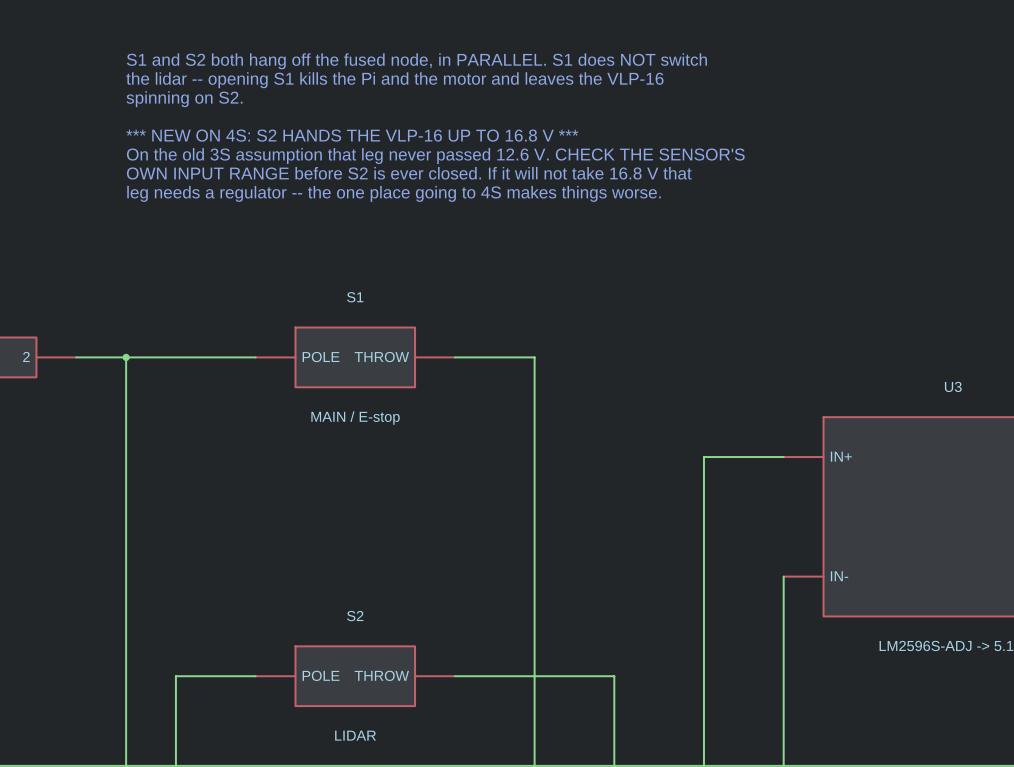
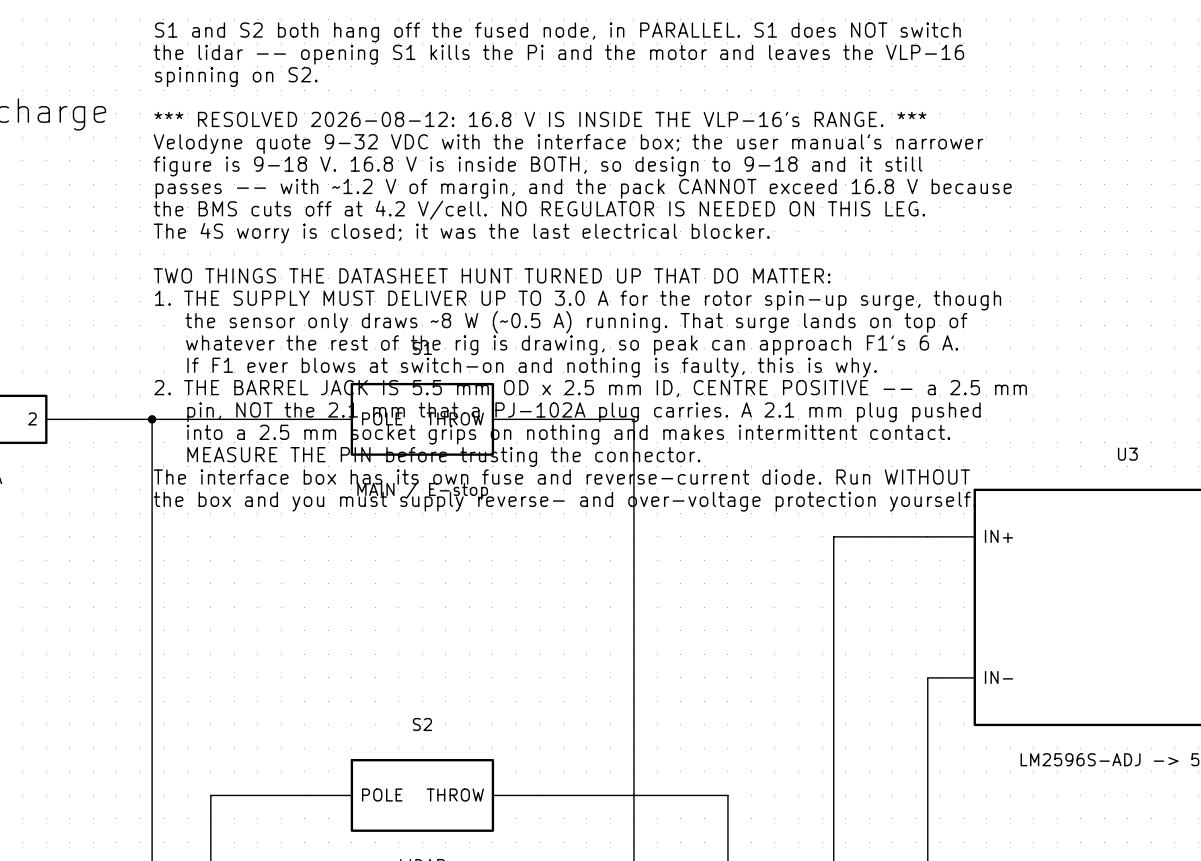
text position: S1 and S2 both hang off the fused node, in PARALLEL. S1 does NOT switch (416, 61) -> S1 and S2 both hang off the fused node, in PARALLEL. S1 does NOT switch (557, 32)
text position: the lidar -- opening S1 kills the Pi and the motor and leaves the VLP-16 (394, 80) -> the lidar -- opening S1 kills the Pi and the motor and leaves the VLP-16 (558, 54)
text position: spinning on S2. (184, 99) -> spinning on S2. (236, 77)
text: none -> *** RESOLVED 2026-08-12: 16.8 V IS INSIDE THE VLP-16's RANGE. *** (540, 119)
text: none -> Velodyne quote 9-32 VDC with the interface box; the user manual's narrower (568, 144)
text: *** NEW ON 4S: S2 HANDS THE VLP-16 UP TO 16.8 V *** (352, 135) -> figure is 9-18 V. 16.8 V is inside BOTH, so design to 9-18 and it still (538, 166)
text: On the old 3S assumption that leg never passed 12.6 V. CHECK THE SENSOR'S (435, 156) -> passes -- with ~1.2 V of margin, and the pack CANNOT exceed 16.8 V because (583, 188)
text: OWN INPUT RANGE before S2 is ever closed. If it will not take 16.8 V that (409, 173) -> the BMS cuts off at 4.2 V/cell. NO REGULATOR IS NEEDED ON THIS LEG. (539, 210)
text: leg needs a regulator -- the one place going to 4S makes things worse. (394, 193) -> The 4S worry is closed; it was the last electrical blocker. (461, 233)
text: none -> TWO THINGS THE DATASHEET HUNT TURNED UP THAT DO MATTER: (492, 275)
text: none -> 1. THE SUPPLY MUST DELIVER UP TO 3.0 A for the rotor spin-up surge, though (578, 300)
text: none -> the sensor only draws ~8 W (~0.5 A) running. That surge lands on top of (576, 322)
text: none -> whatever the rest of the rig is drawing, so peak can approach F1's 6 A. (572, 345)
text: none -> If F1 ever blows at switch-on and nothing is faulty, this is why. (532, 367)
text: none -> 2. THE BARREL JACK IS 5.5 mm OD x 2.5 mm ID, CENTRE POSITIVE -- a 2.5 mm (590, 388)
text: none -> pin, NOT the 2.1 mm that a PJ-102A plug carries. A 2.1 mm plug pushed (584, 412)
text: none -> into a 2.5 mm socket grips on nothing and makes intermittent contact. (568, 434)
text: none -> MEASURE THE PIN before trusting the connector. (443, 456)
text: none -> The interface box has its own fuse and reverse-current diode. Run WITHOUT (561, 477)
text: none -> the box and you must supply reverse- and over-voltage protection yourself. (564, 501)

